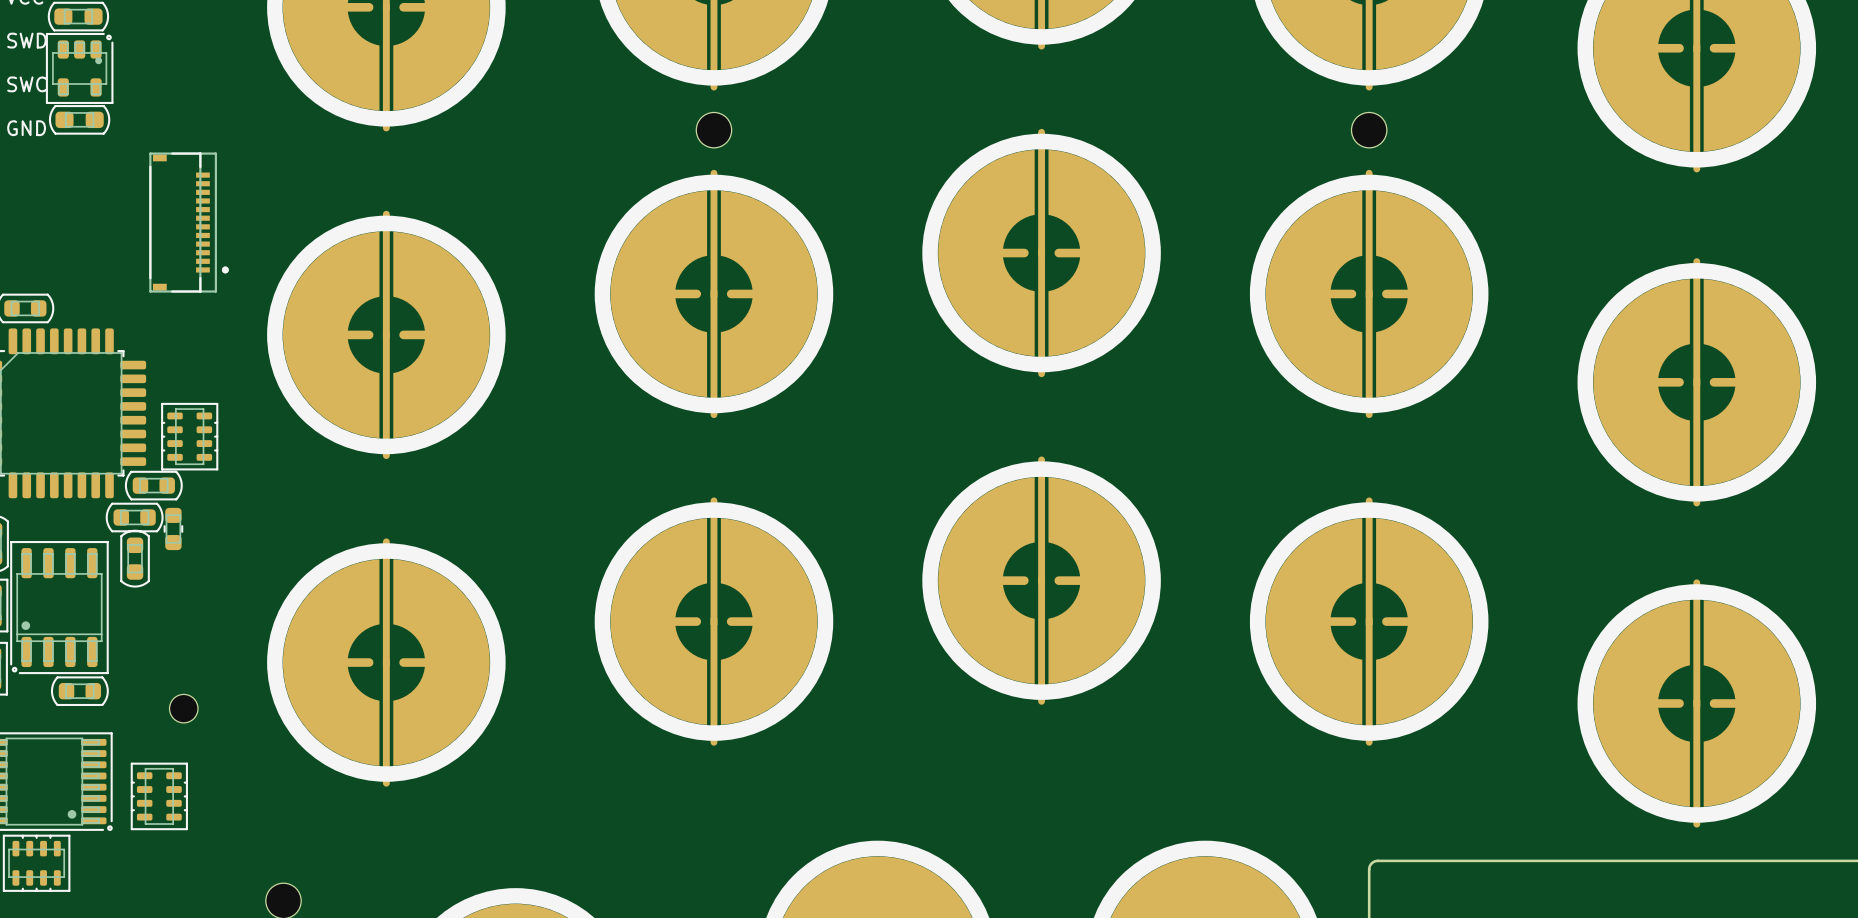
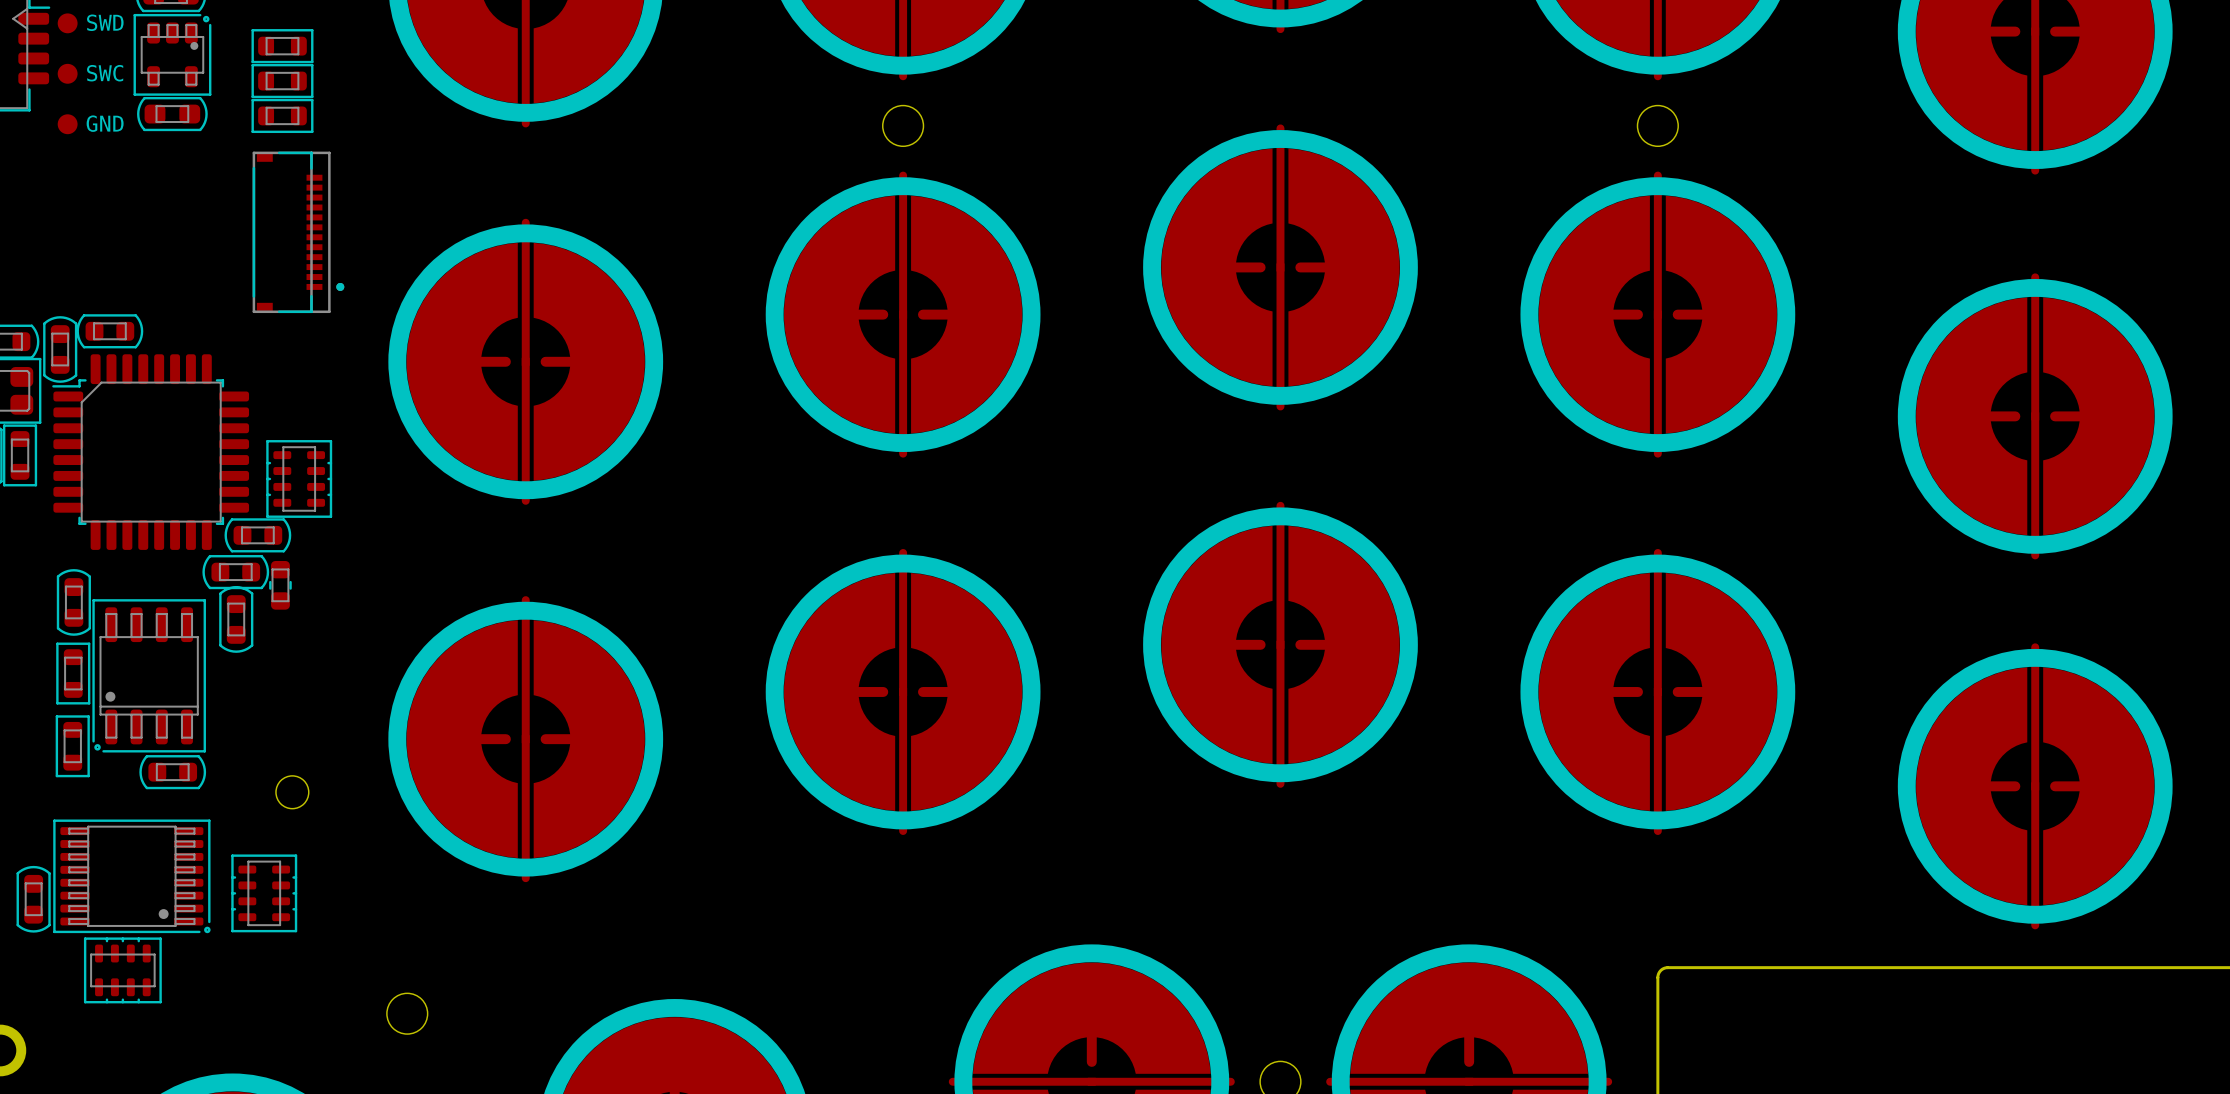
part: none -> (282, 46)
part: none -> (282, 81)
part: none -> (282, 115)

